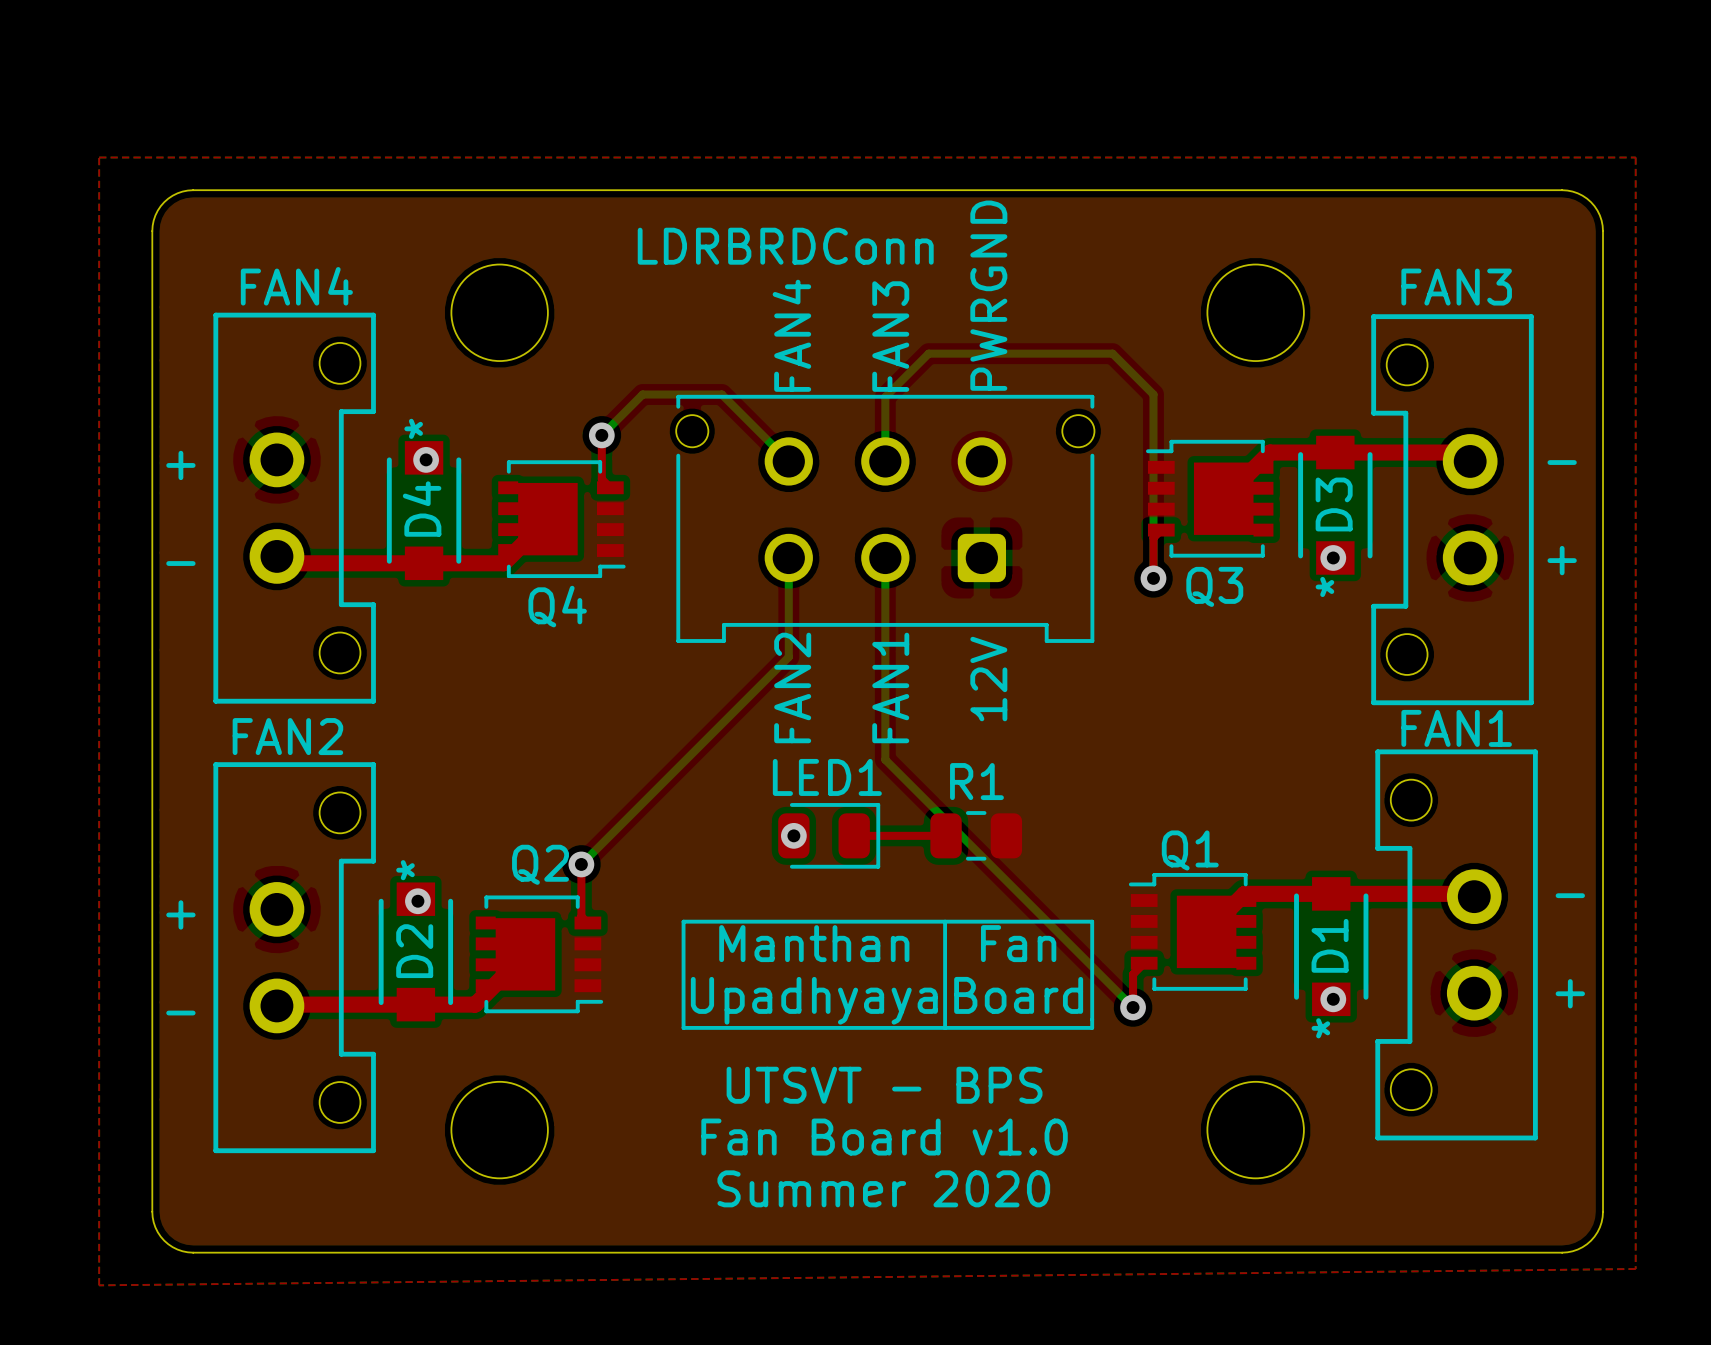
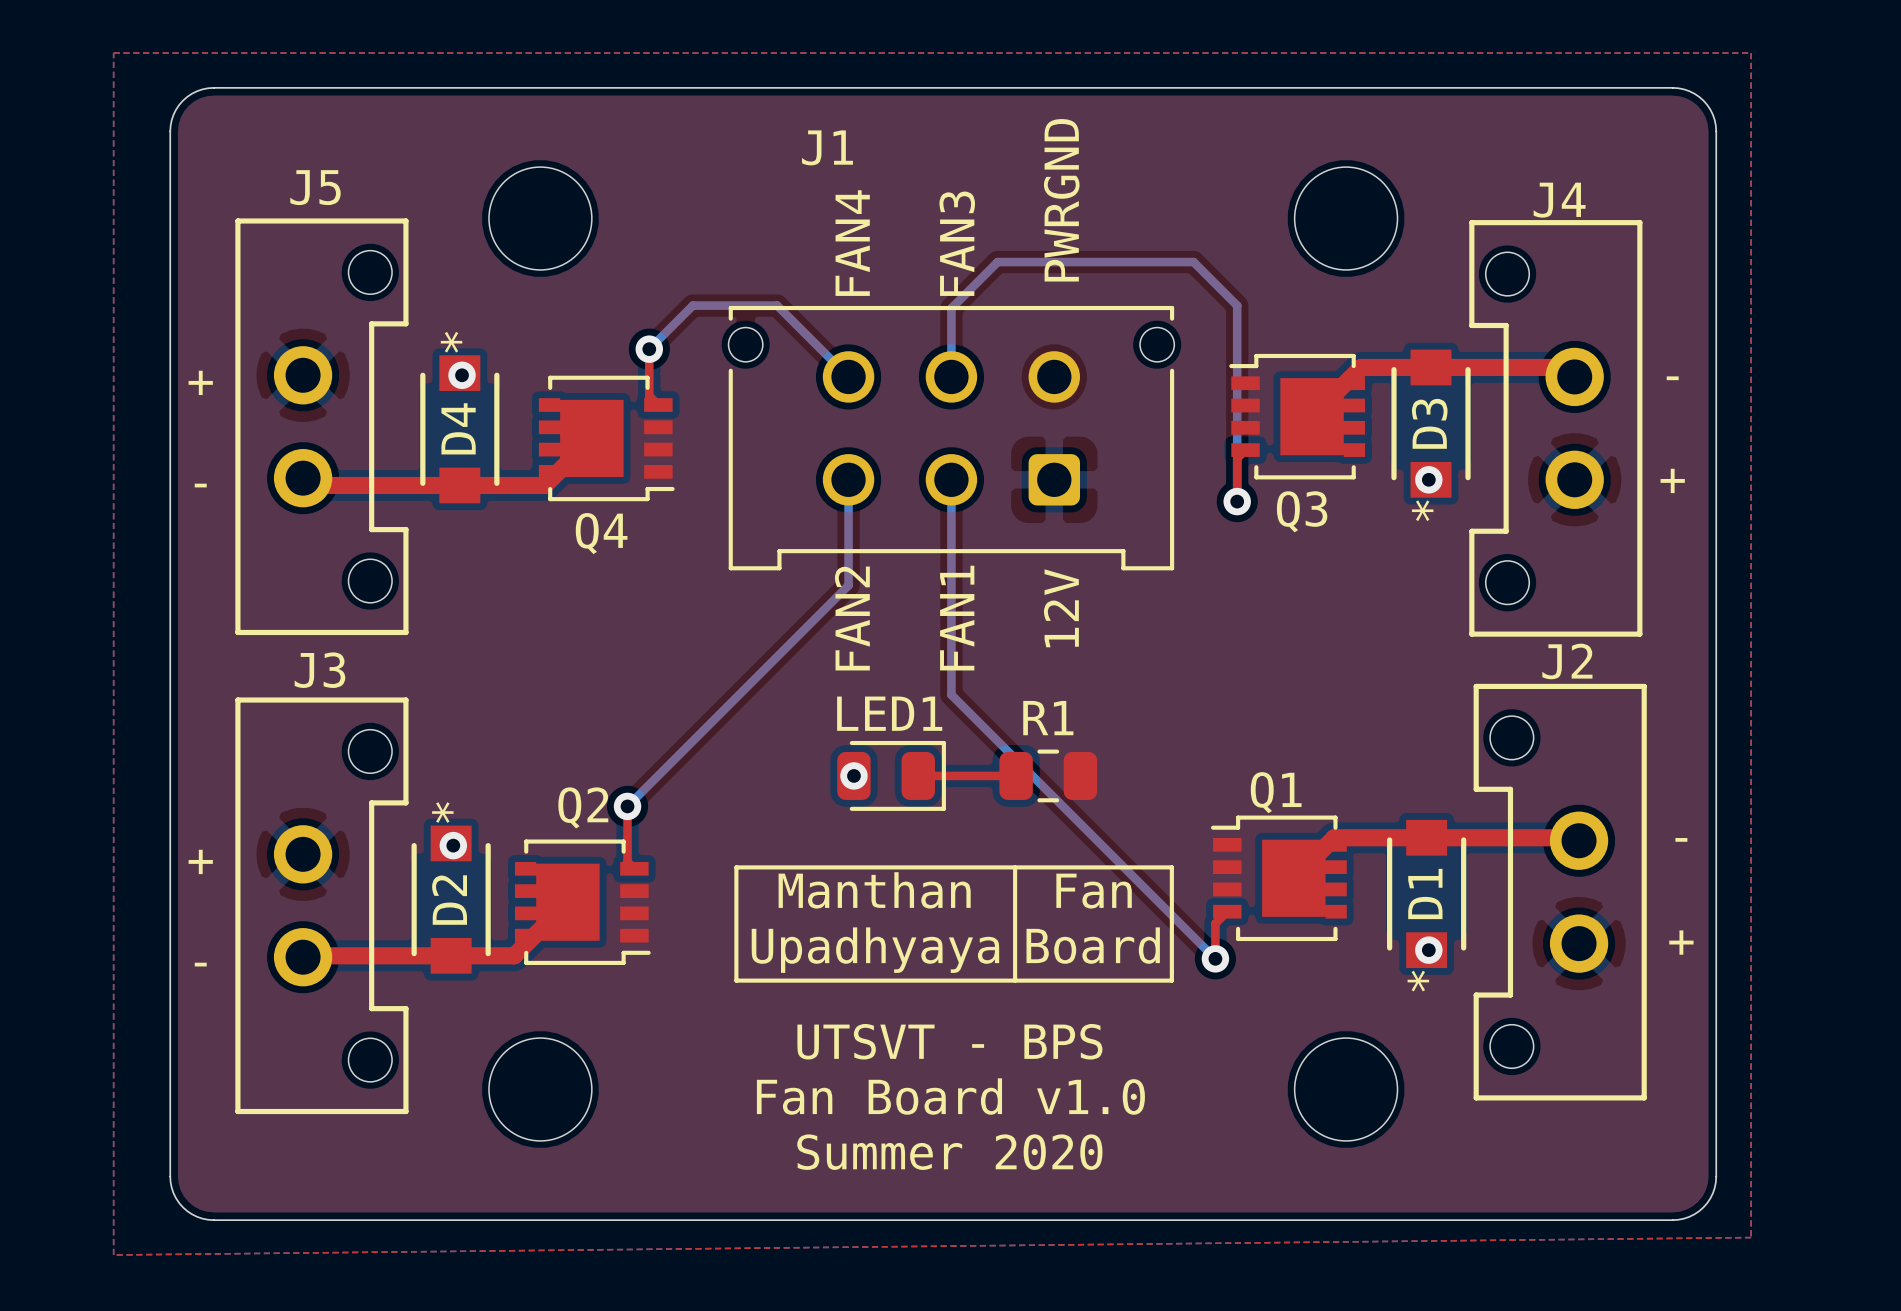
J1 name: none -> J1 (827, 147)
text: LDRBRDConn (785, 246) -> none
J5 name: none -> J5 (315, 187)
text: FAN4 (296, 286) -> none
text: FAN3 (1456, 287) -> none
J4 name: none -> J4 (1559, 200)
text: FAN1 (1456, 728) -> none
J2 name: none -> J2 (1567, 661)
text: FAN2 (287, 736) -> none
J3 name: none -> J3 (319, 670)

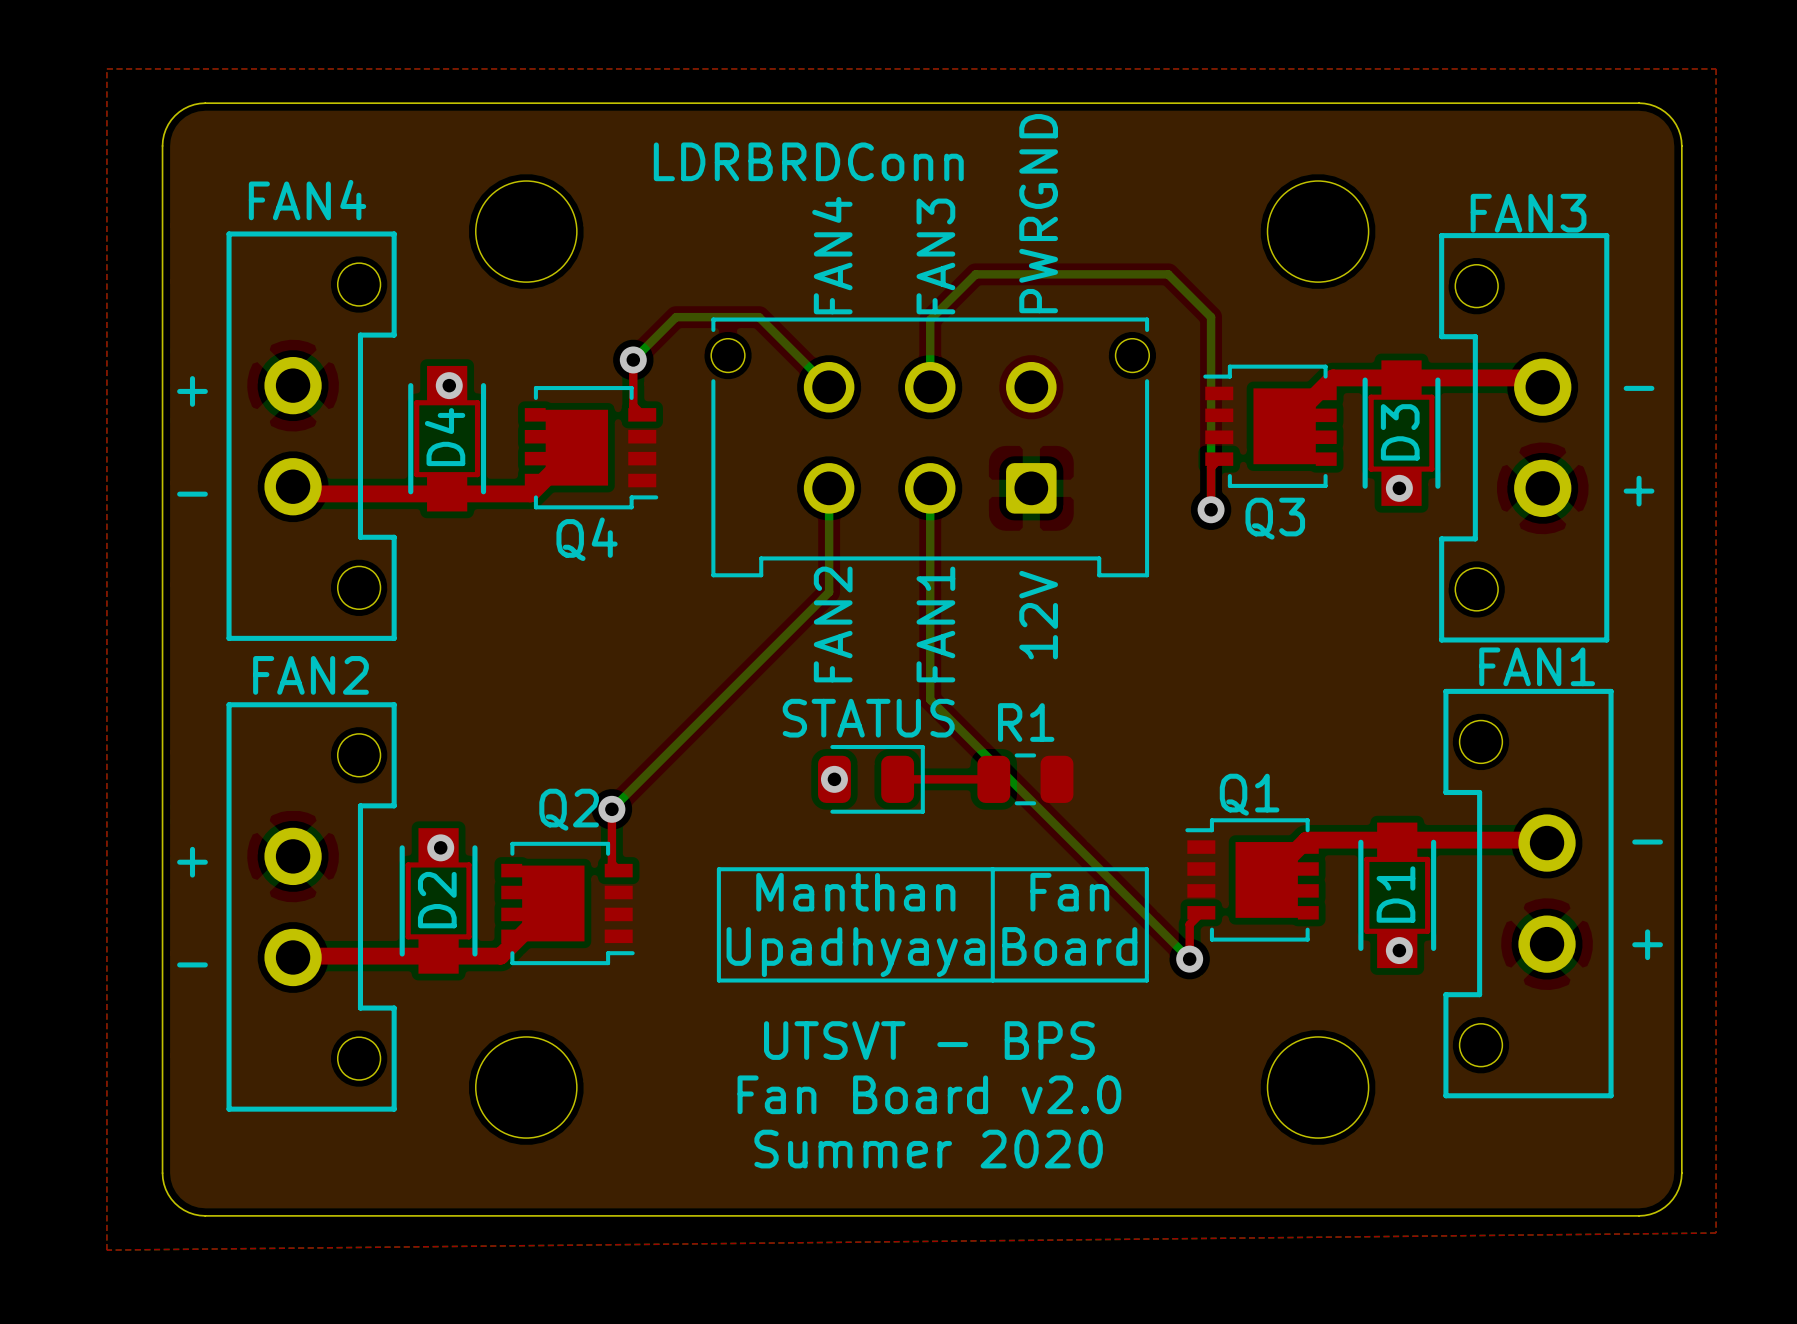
J1 name: J1 (827, 147) -> LDRBRDConn (808, 161)
J5 name: J5 (315, 187) -> FAN4 (307, 200)
J4 name: J4 (1559, 200) -> FAN3 (1528, 213)
D3 footprint: [1391, 349, 1471, 498] -> [1362, 360, 1441, 506]
D4 footprint: [420, 355, 500, 504] -> [408, 365, 487, 512]
J2 name: J2 (1567, 661) -> FAN1 (1537, 666)
J3 name: J3 (319, 670) -> FAN2 (310, 675)
LED1 name: LED1 (889, 713) -> STATUS (868, 718)
D1 footprint: [1387, 819, 1467, 969] -> [1358, 822, 1437, 969]
D2 footprint: [411, 825, 491, 974] -> [399, 828, 478, 974]
text: Fan Board v1.0 (950, 1096) -> Fan Board v2.0 (929, 1094)

